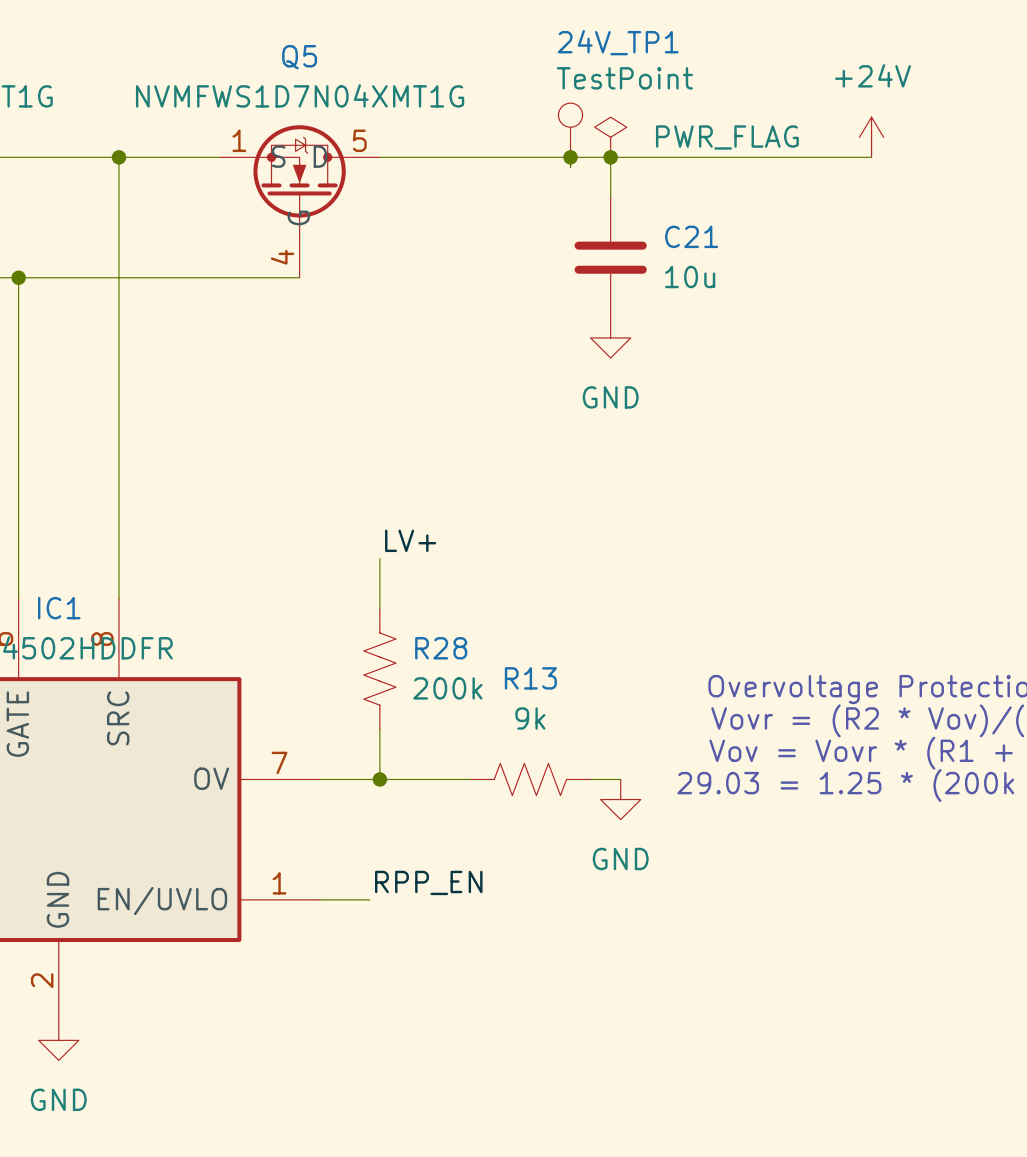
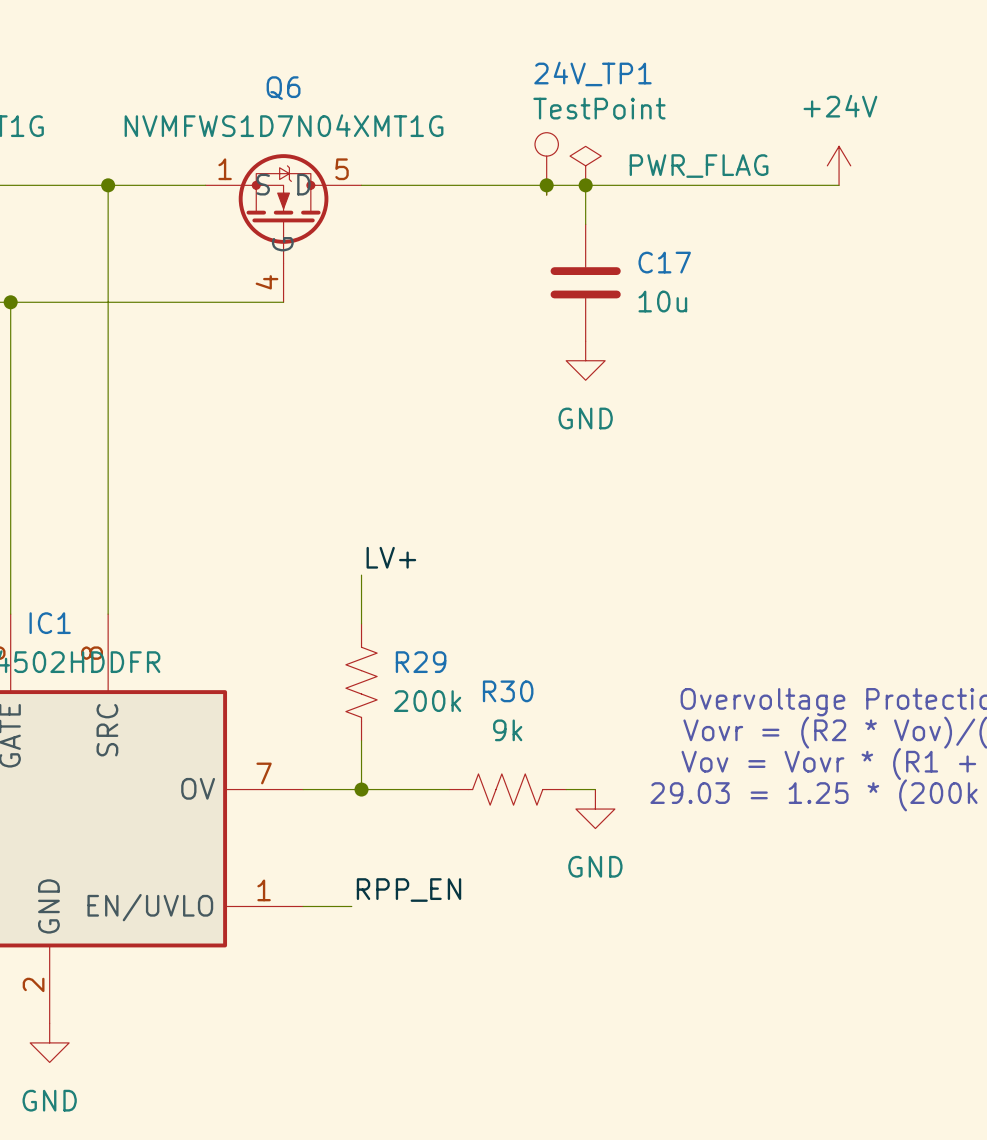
Q5 name: Q5 (299, 57) -> Q6 (283, 88)
C21 name: C21 (691, 236) -> C17 (664, 262)
R28 name: R28 (441, 648) -> R29 (421, 662)
R13 name: R13 (530, 678) -> R30 (508, 691)

